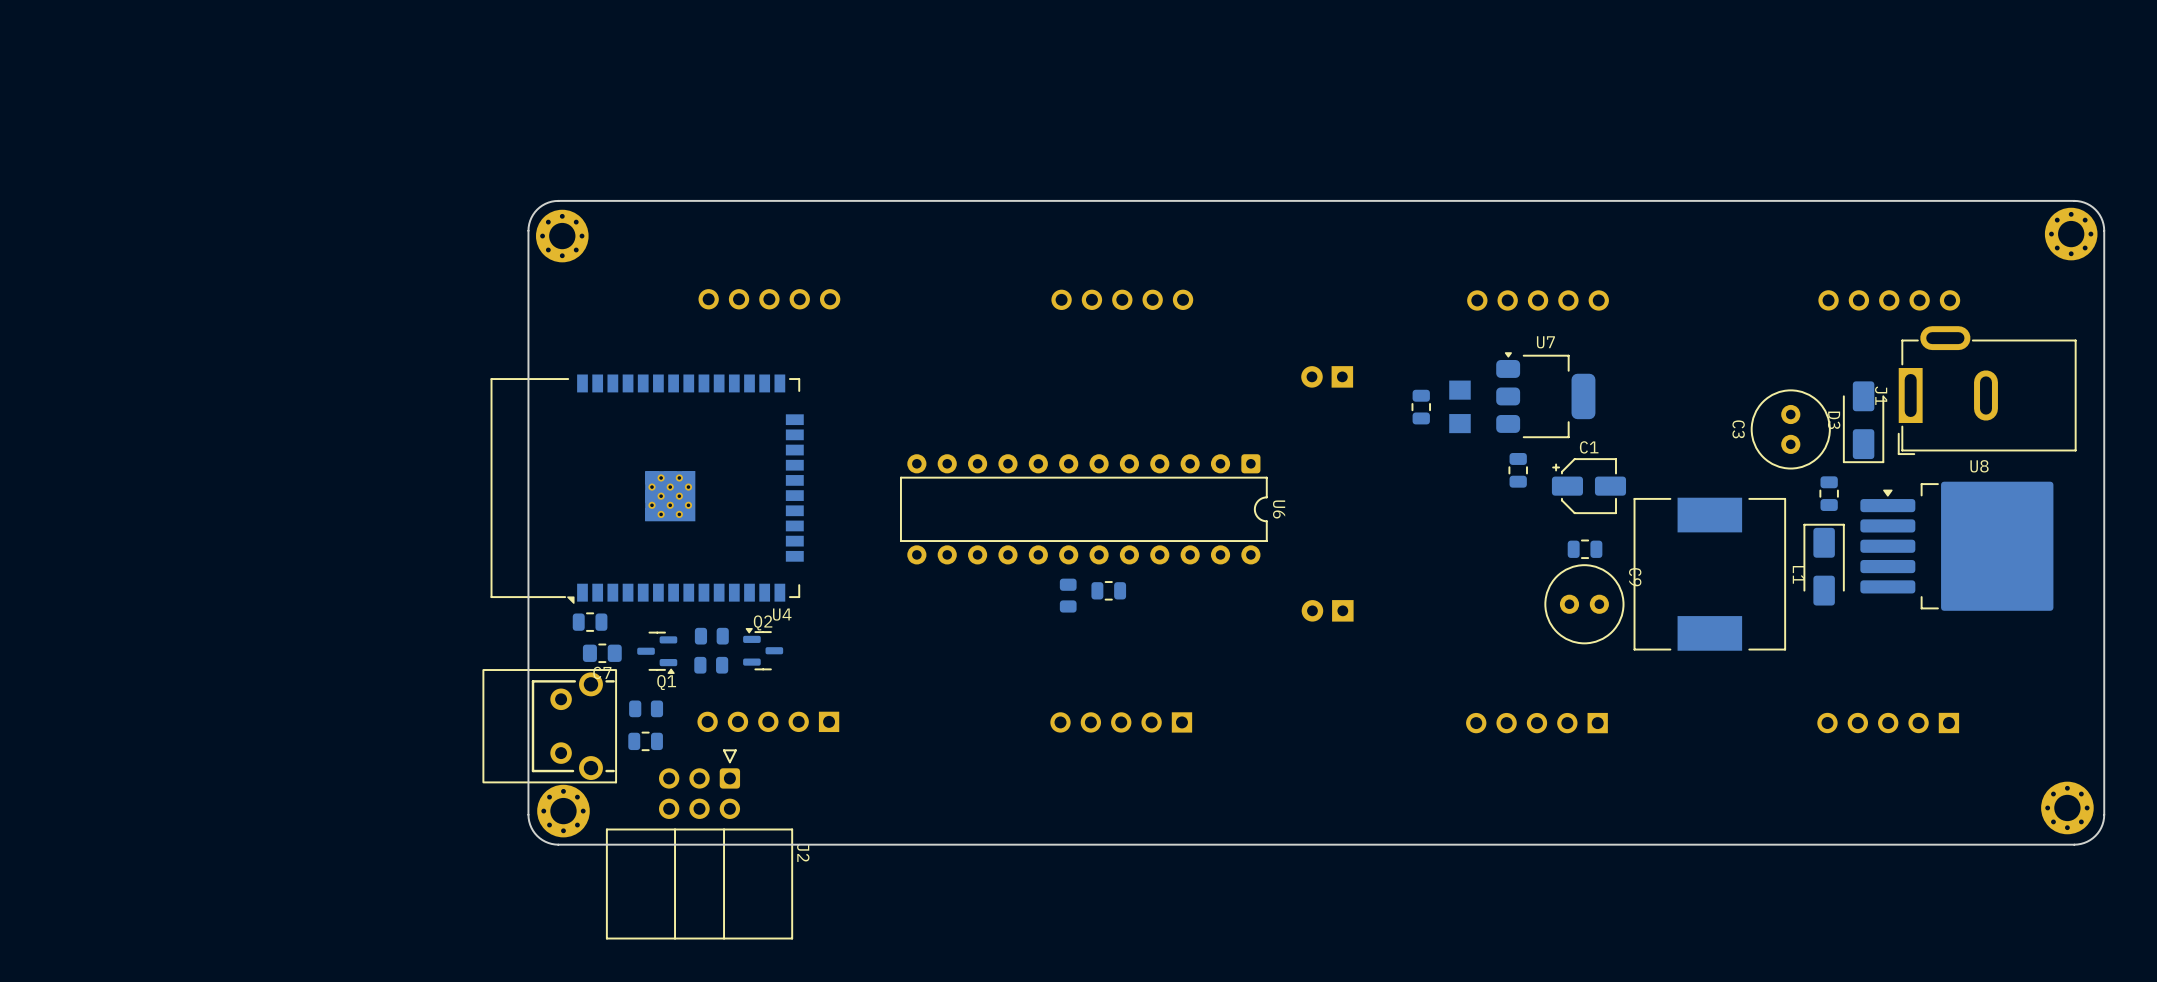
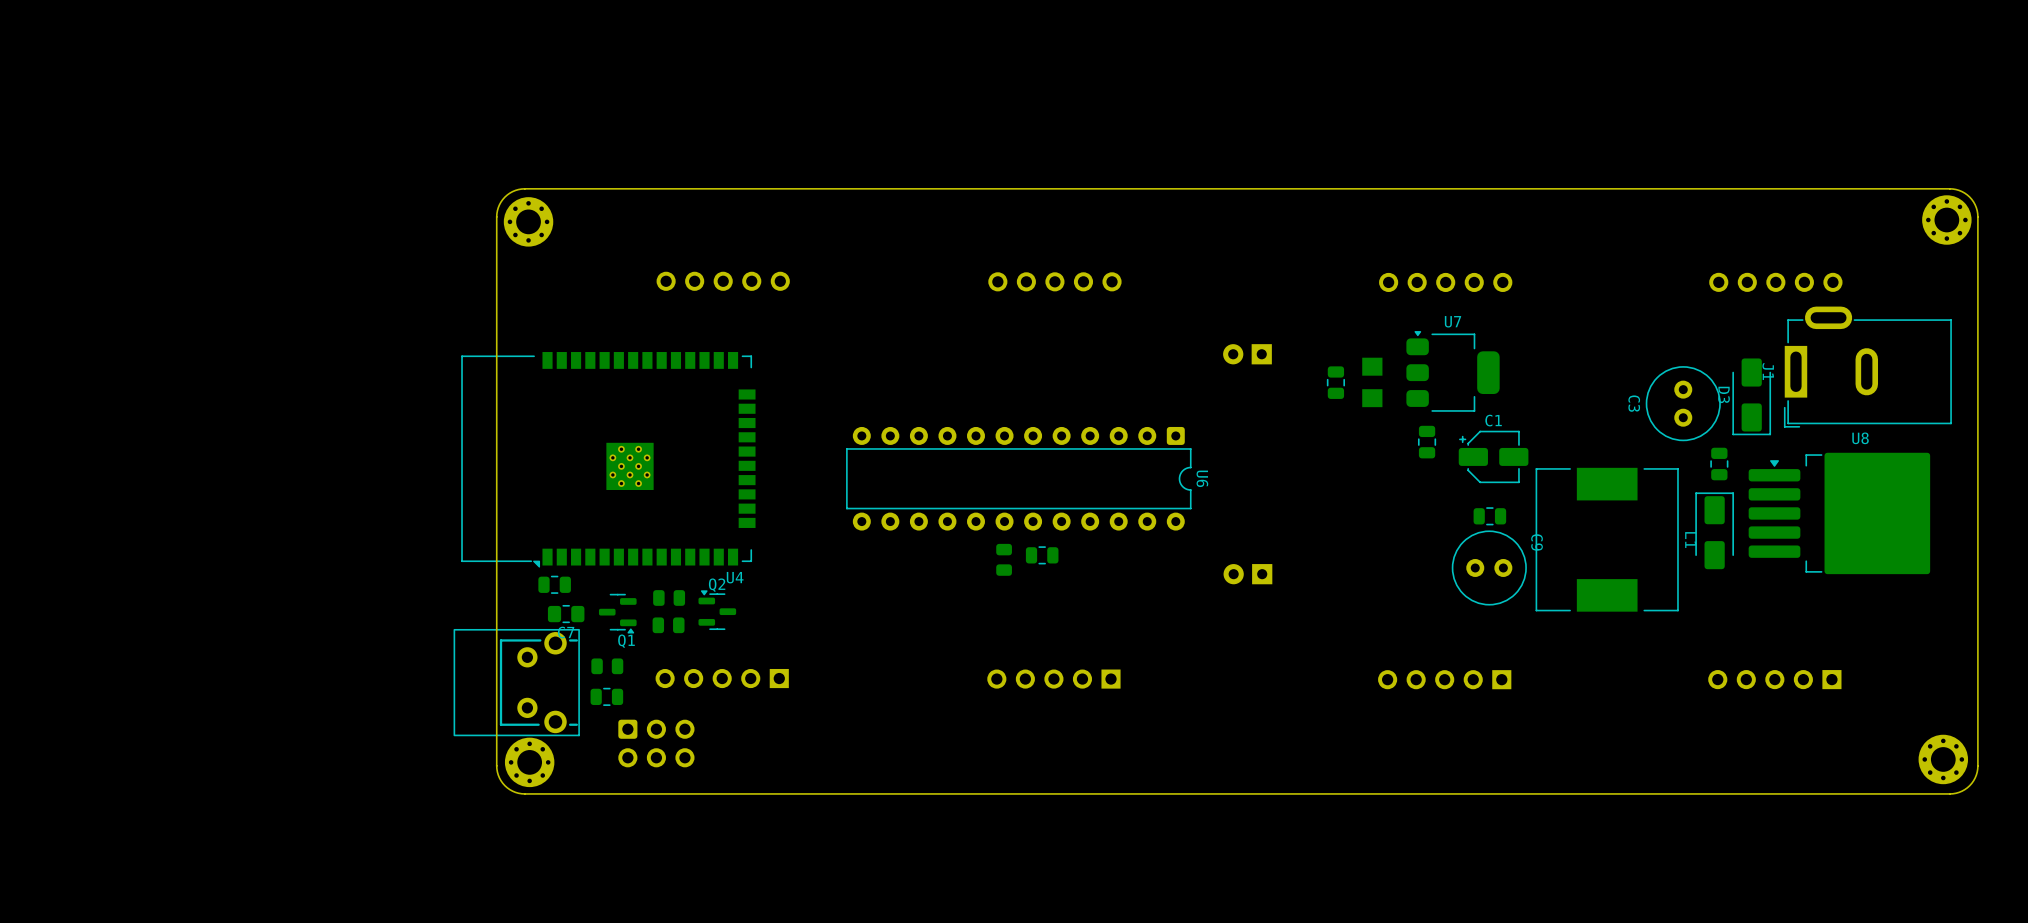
part: none -> (656, 743)
J2: (699, 844) -> none

